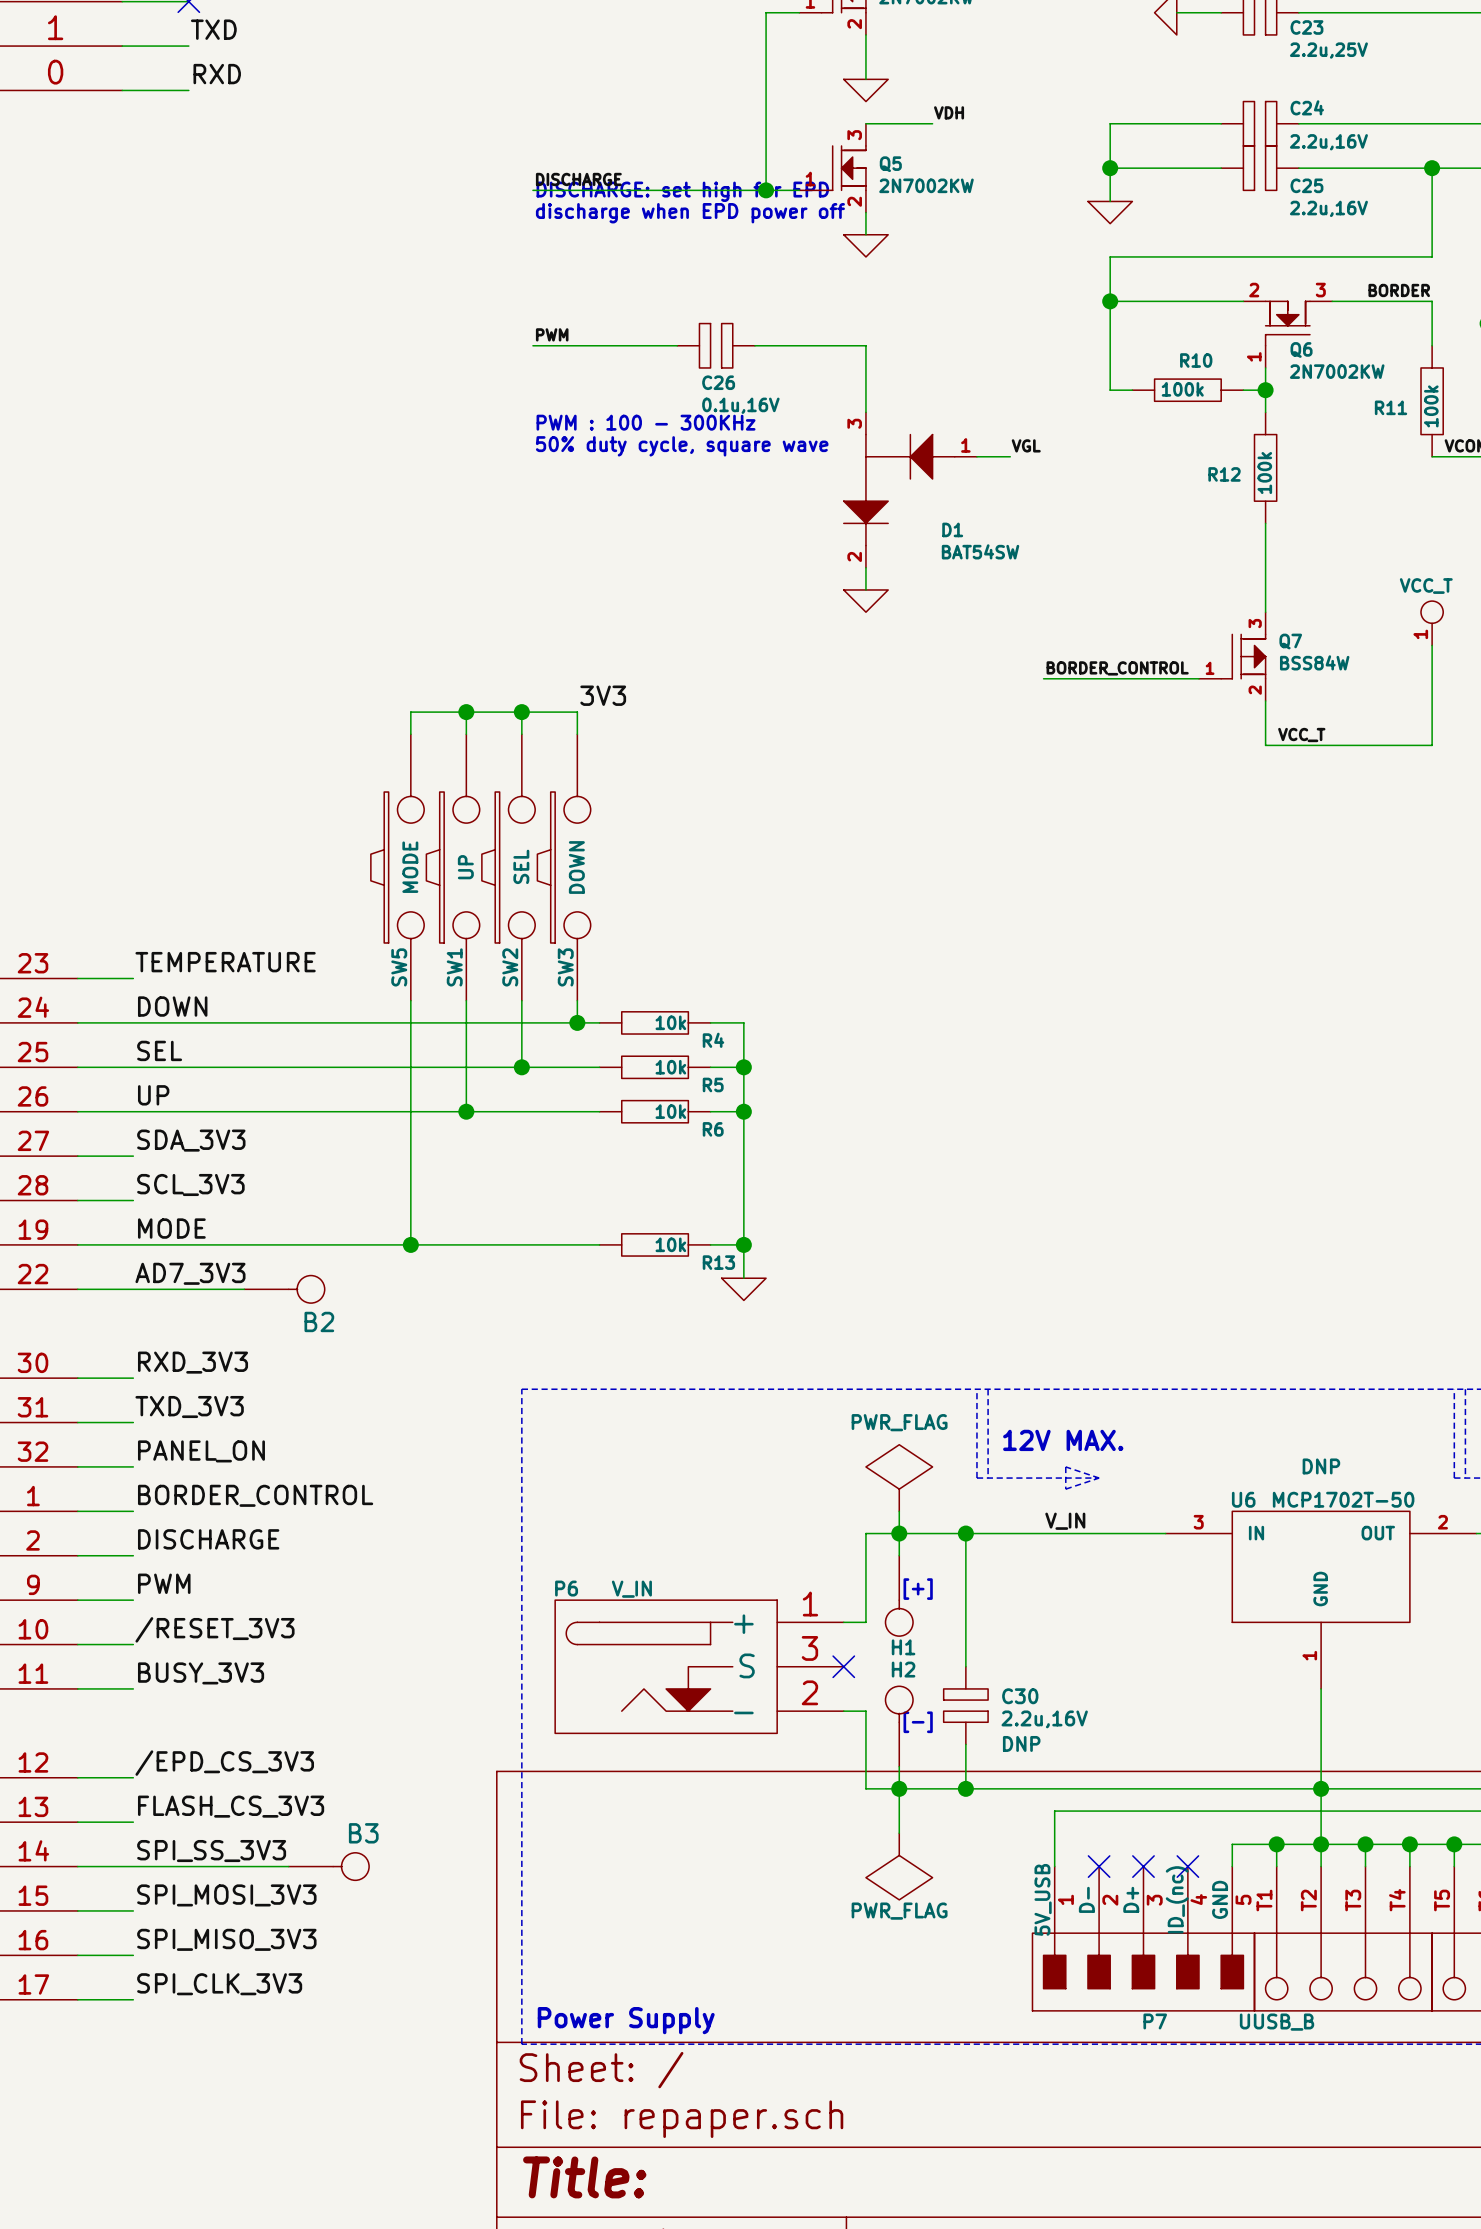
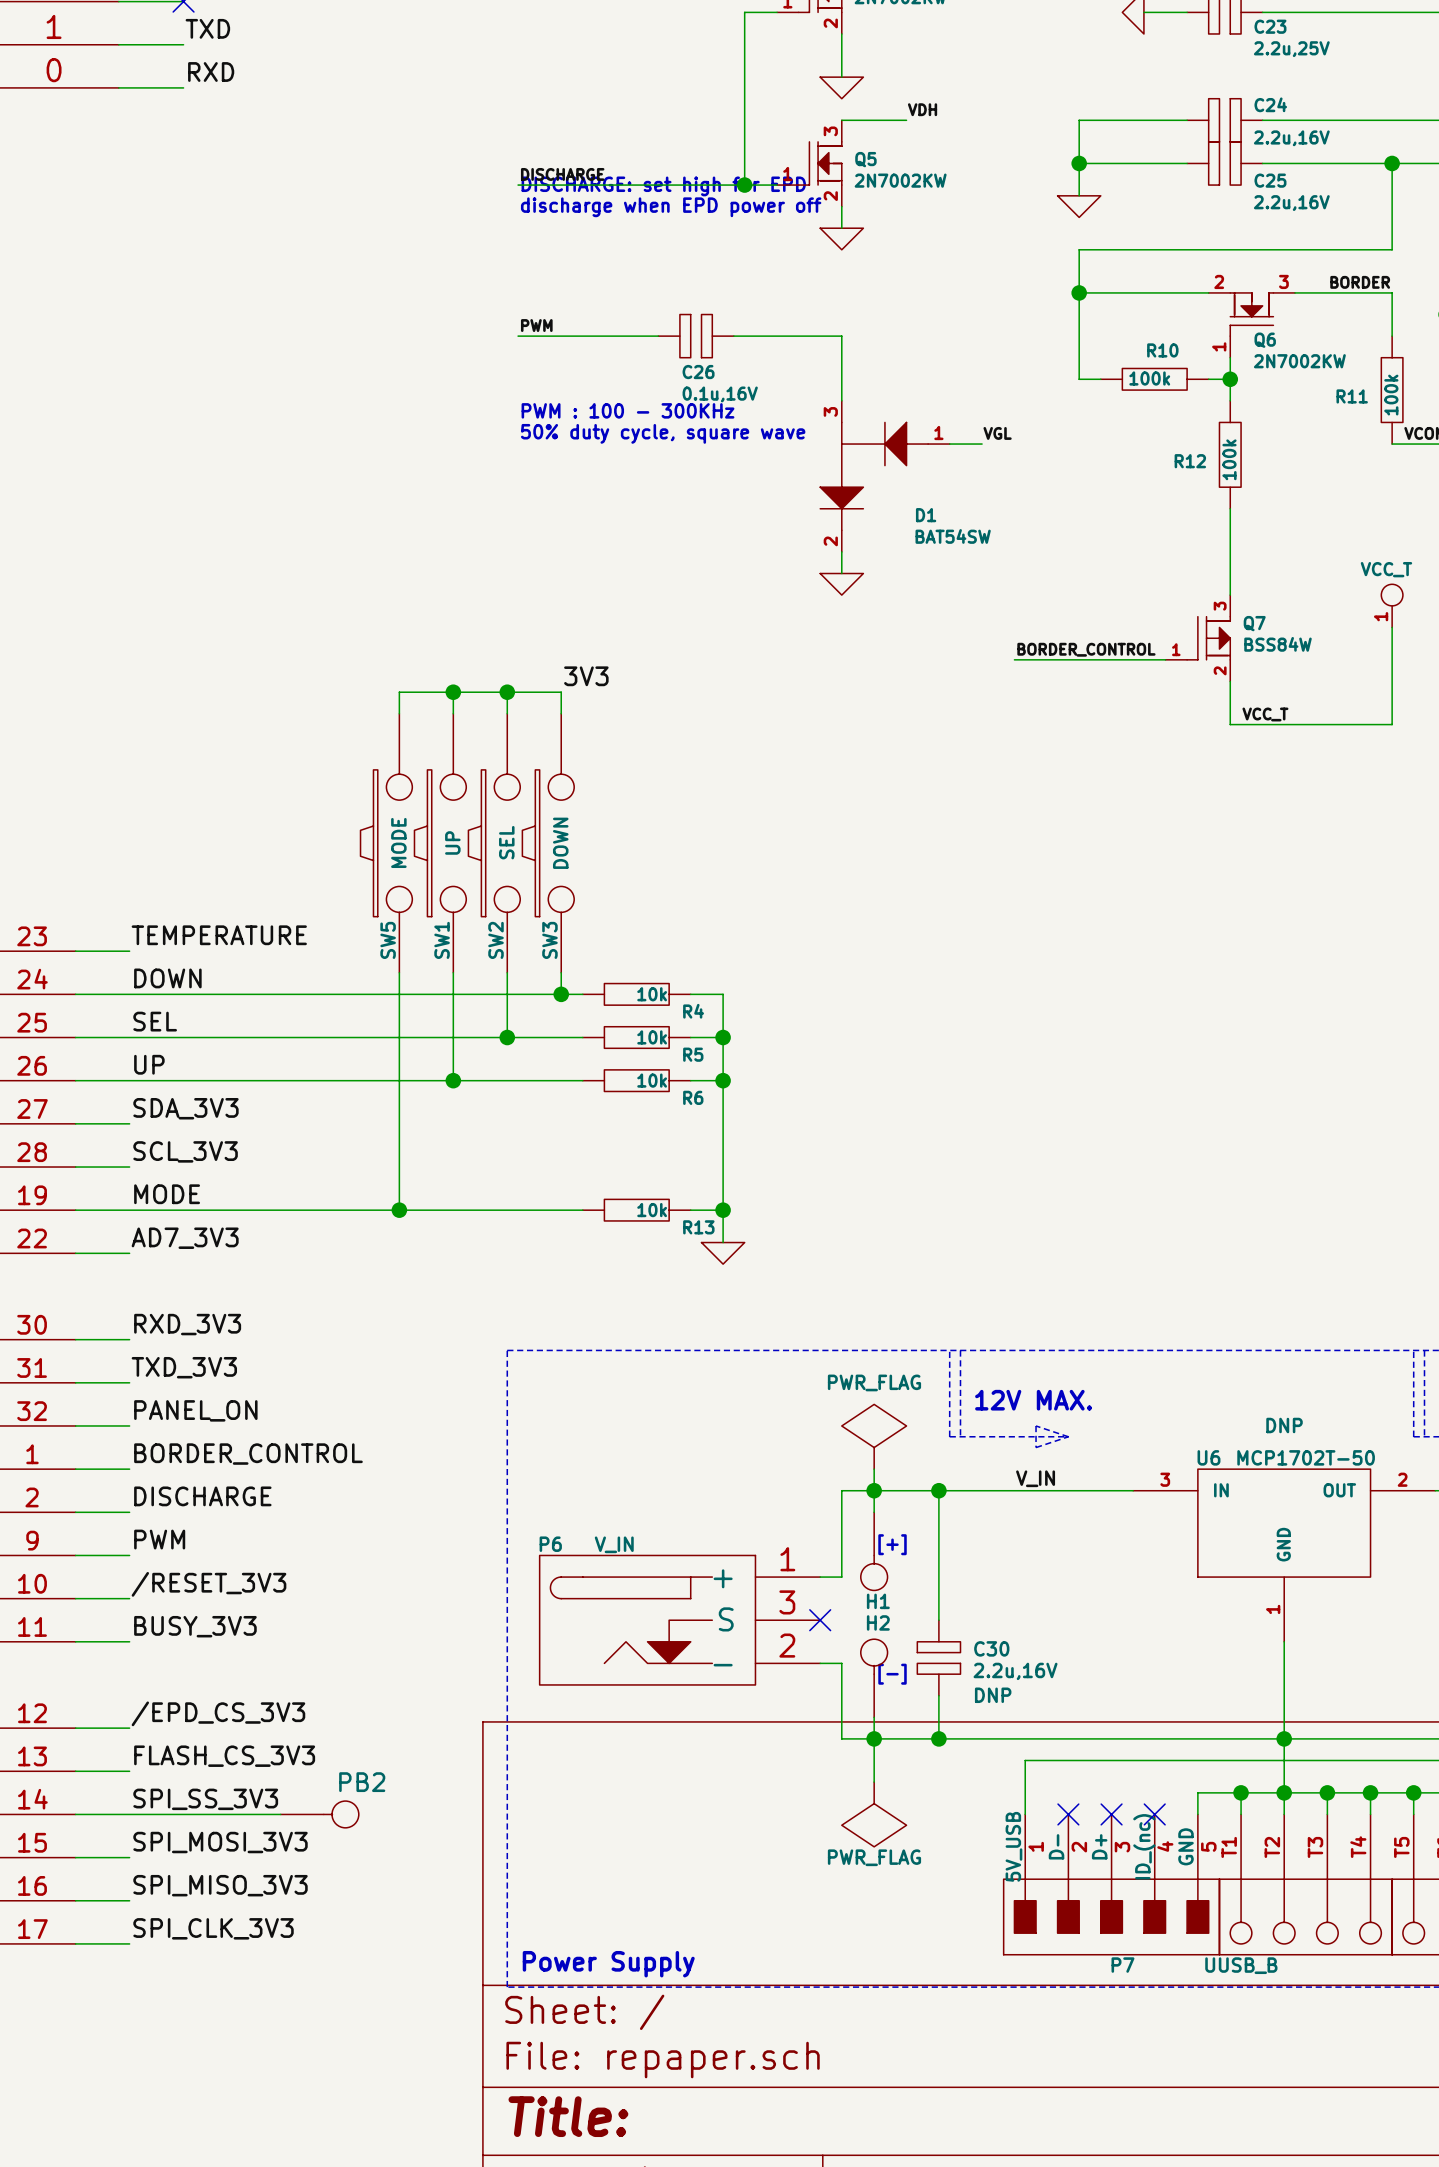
wire: (133, 1289) (244, 1289) -> none
B2: (284, 1289) -> none
B3 name: B3 (363, 1833) -> PB2 (362, 1782)

